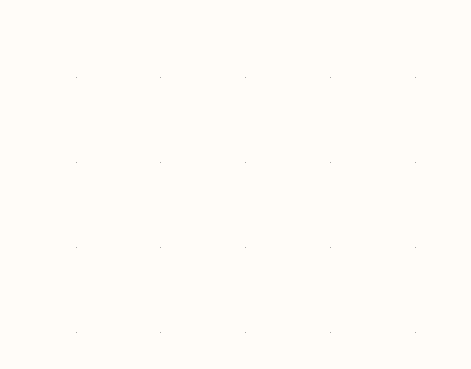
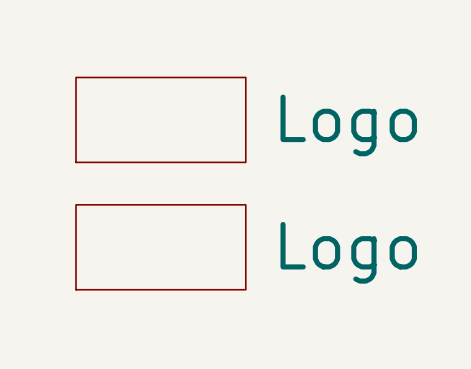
part: none -> Logo (160, 119)
part: none -> Logo (160, 247)

